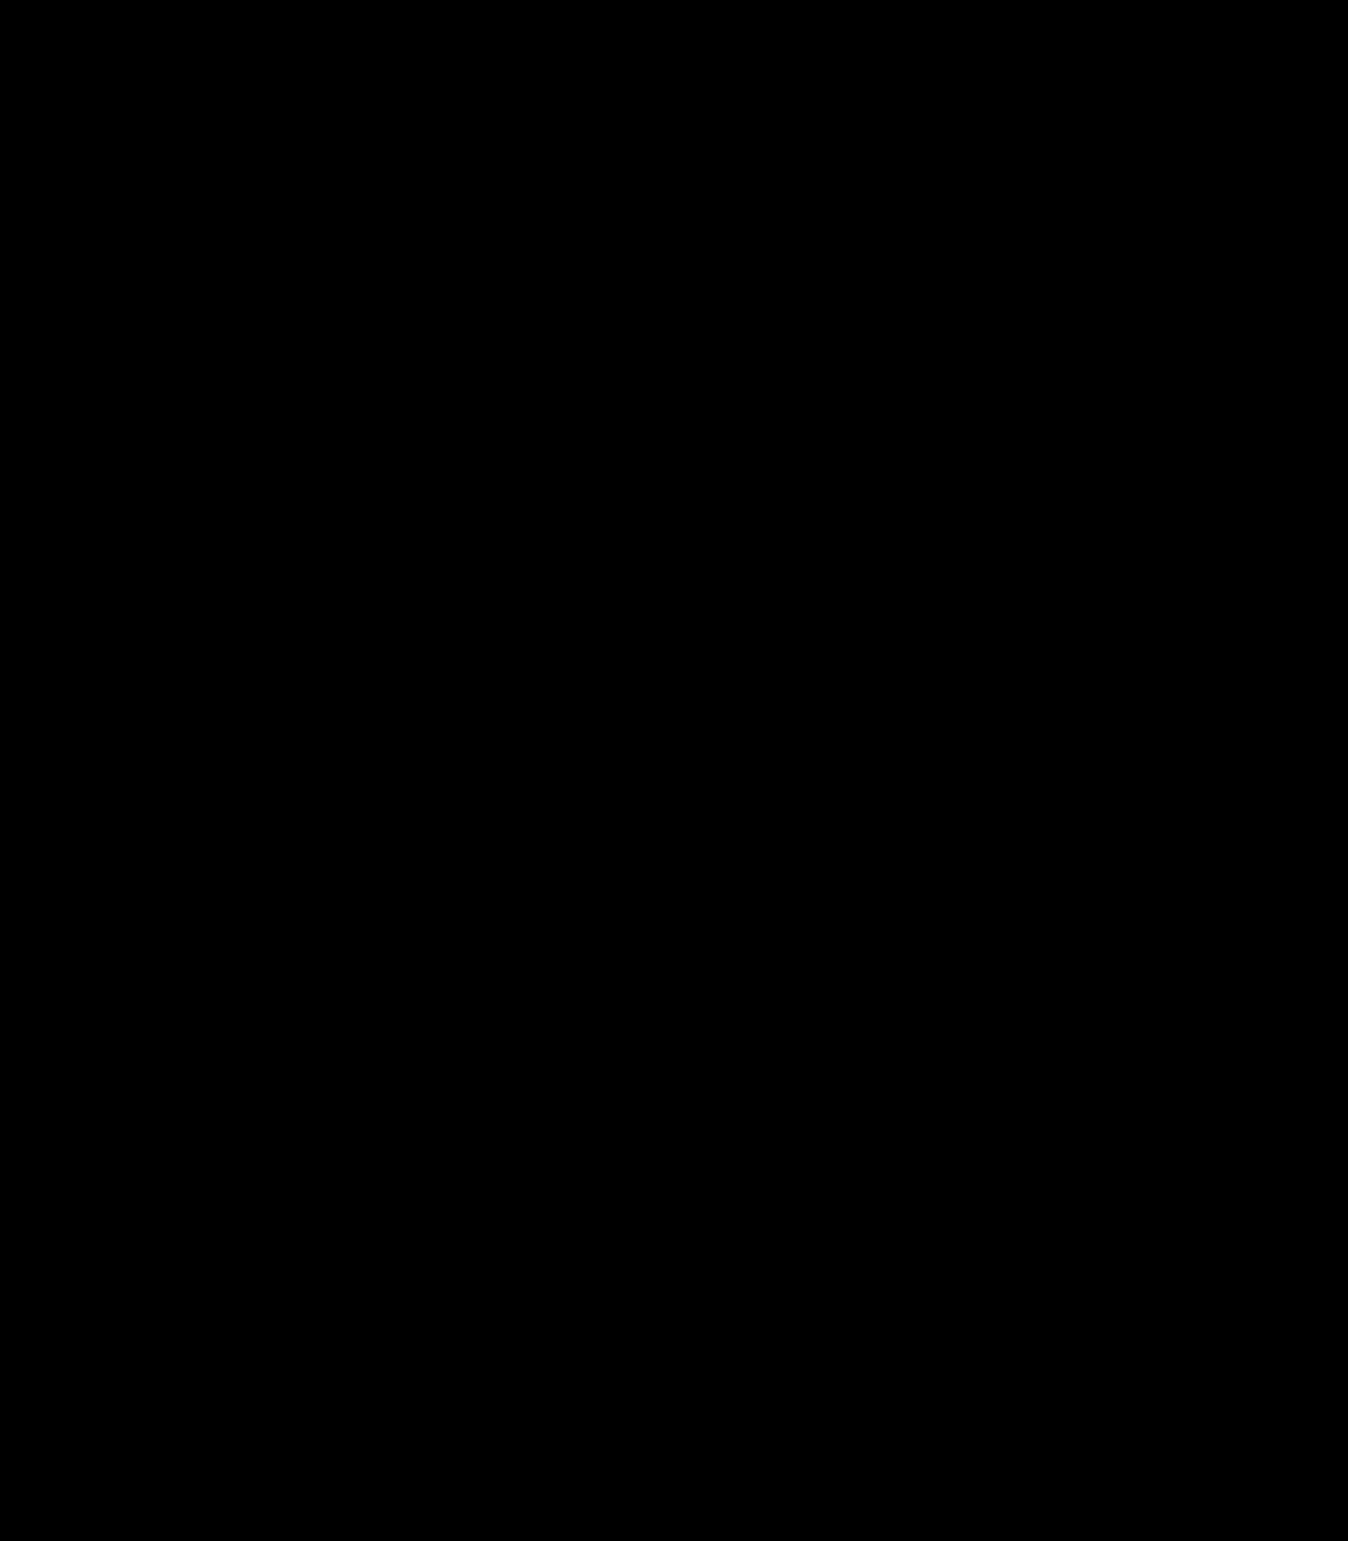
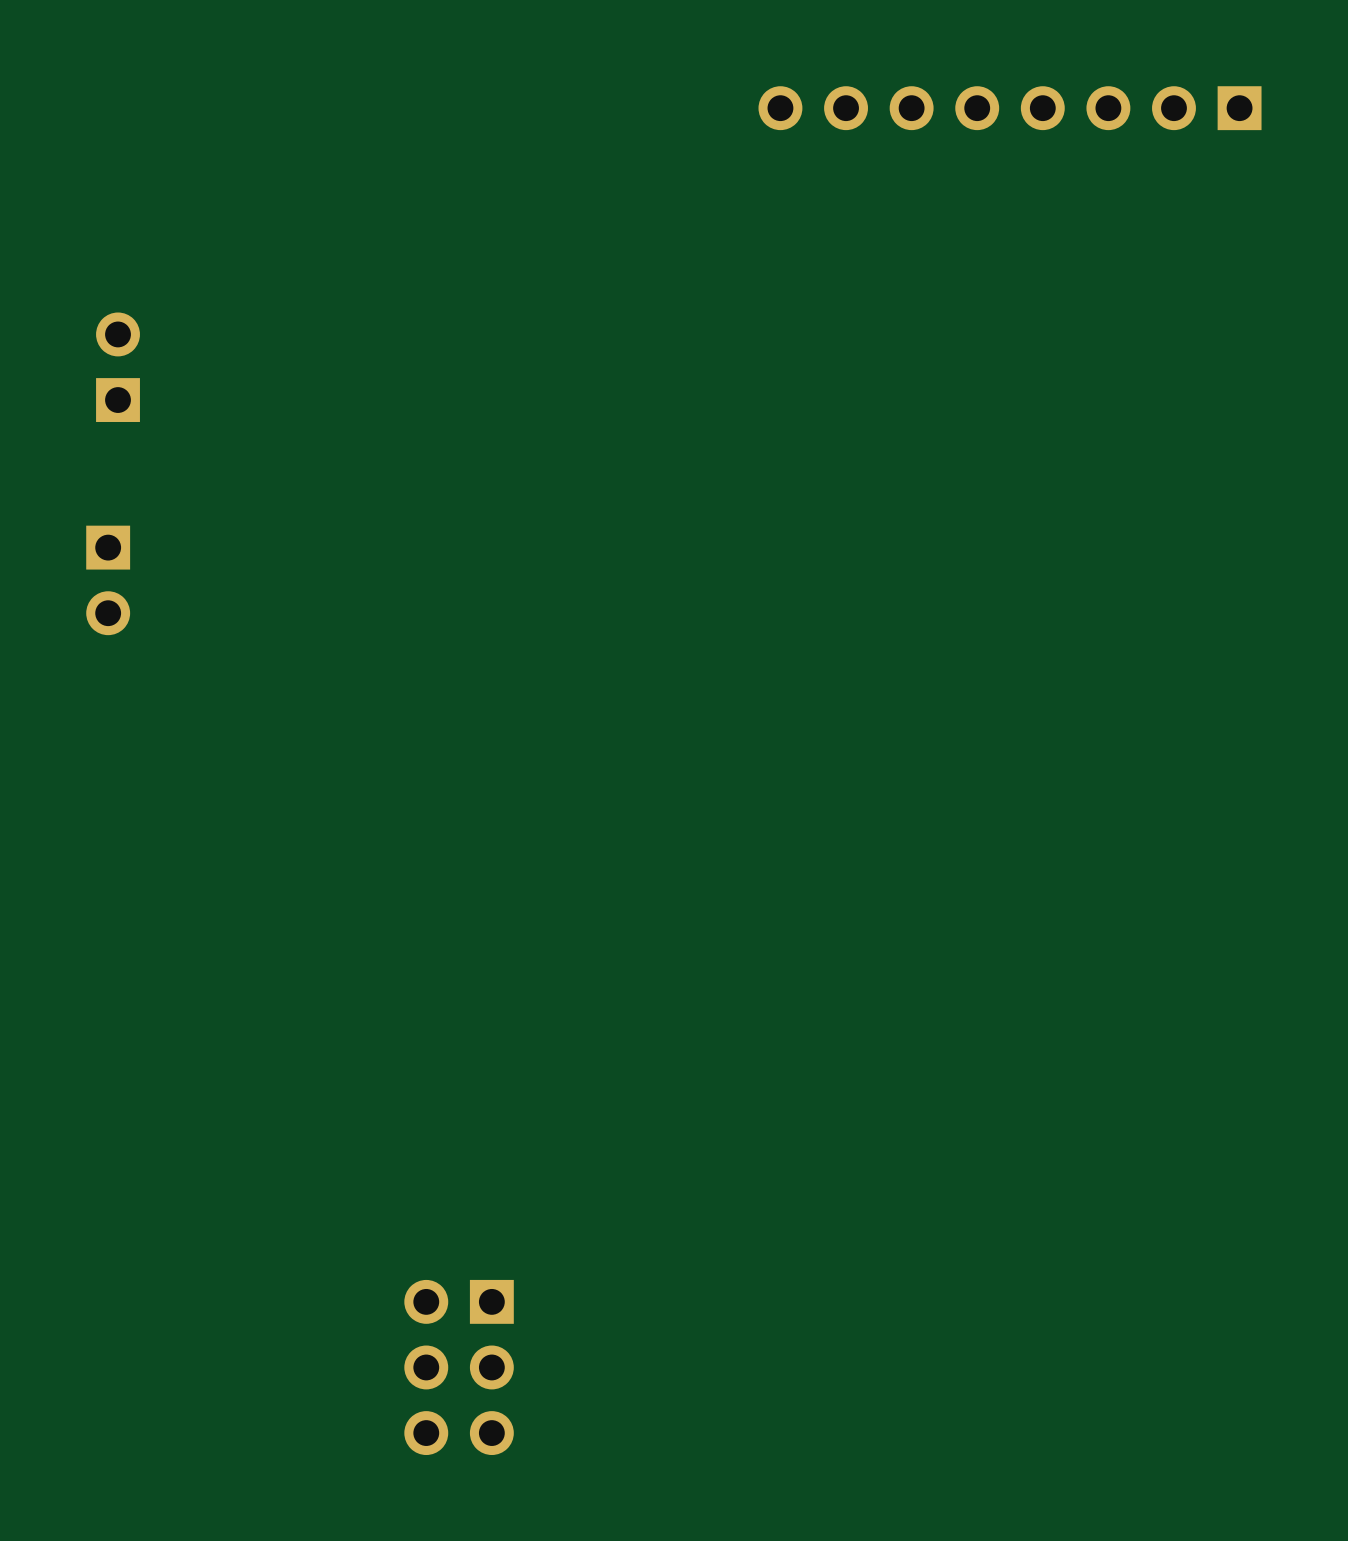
part: none -> (1010, 108)
part: none -> (118, 367)
part: none -> (108, 580)
part: none -> (459, 1367)

